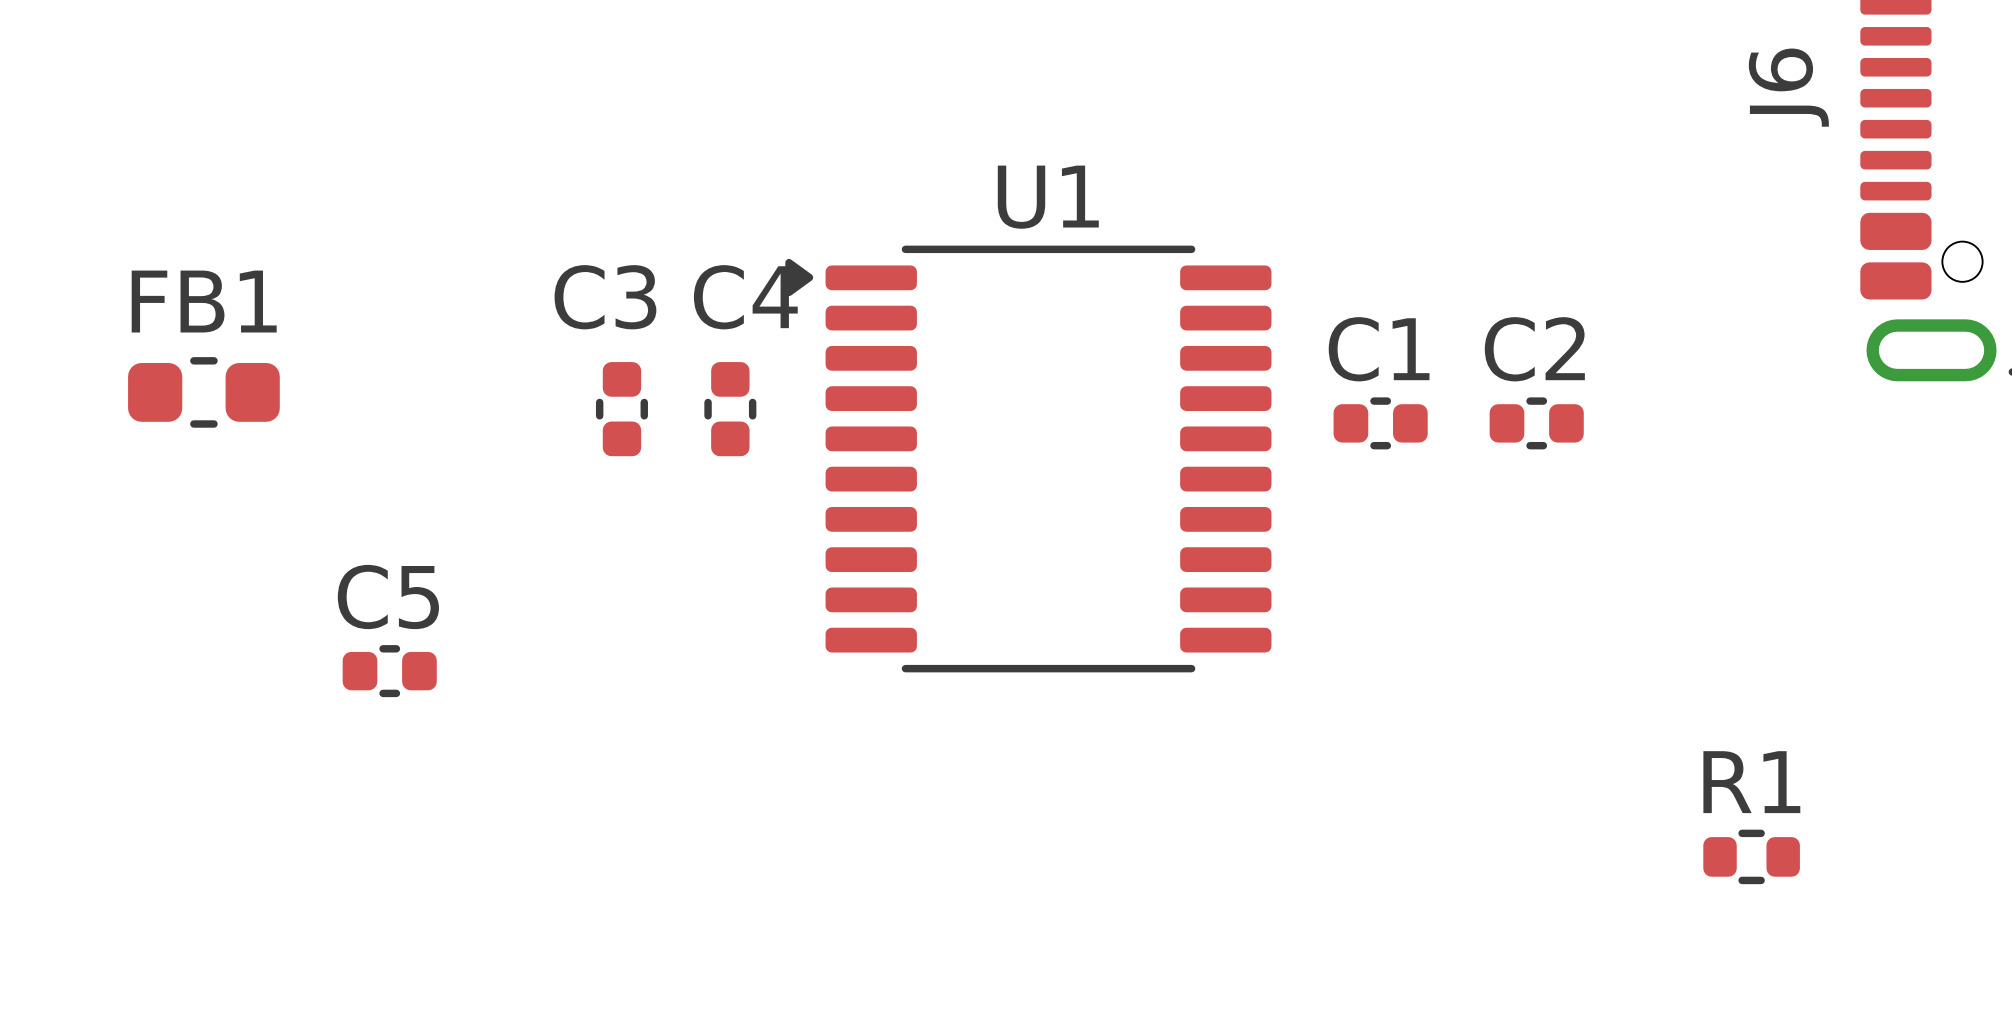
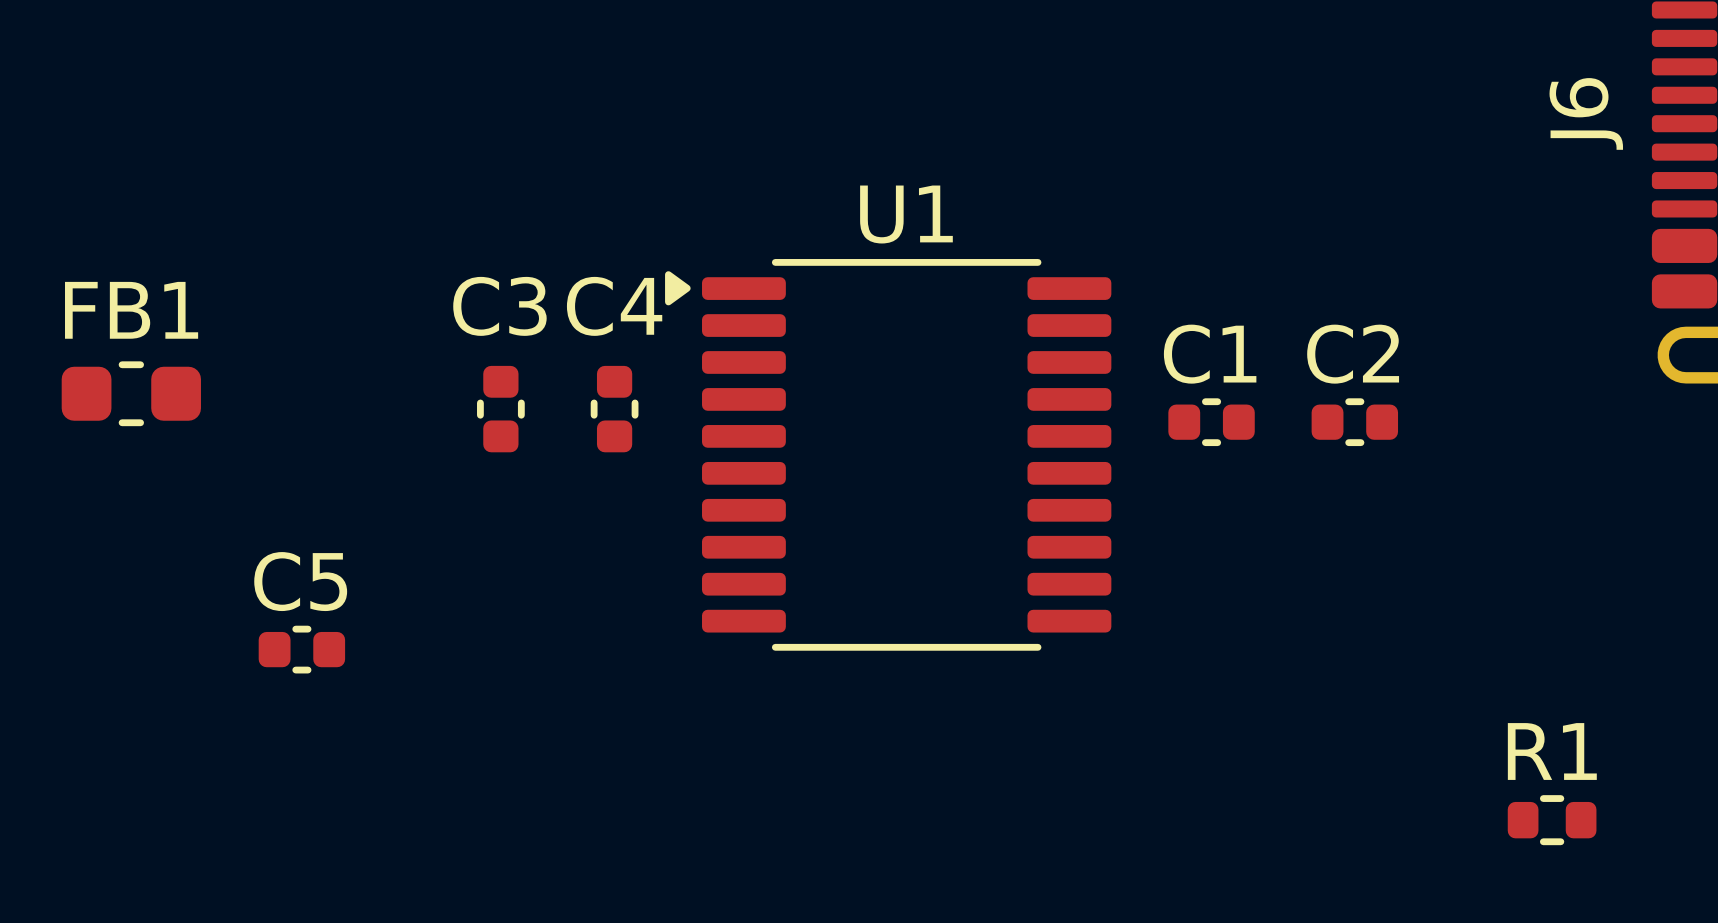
C4 name position: C4 (745, 297) -> C4 (614, 306)
C3 position: (621, 409) -> (500, 409)

